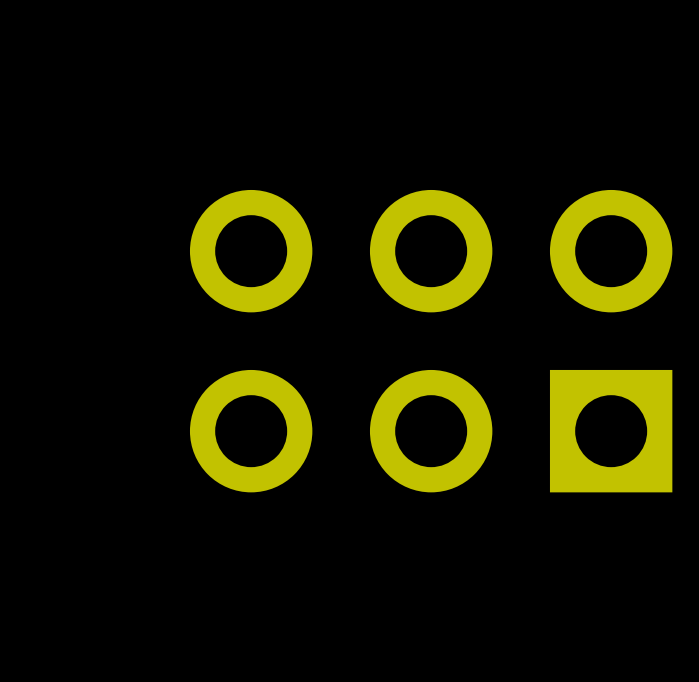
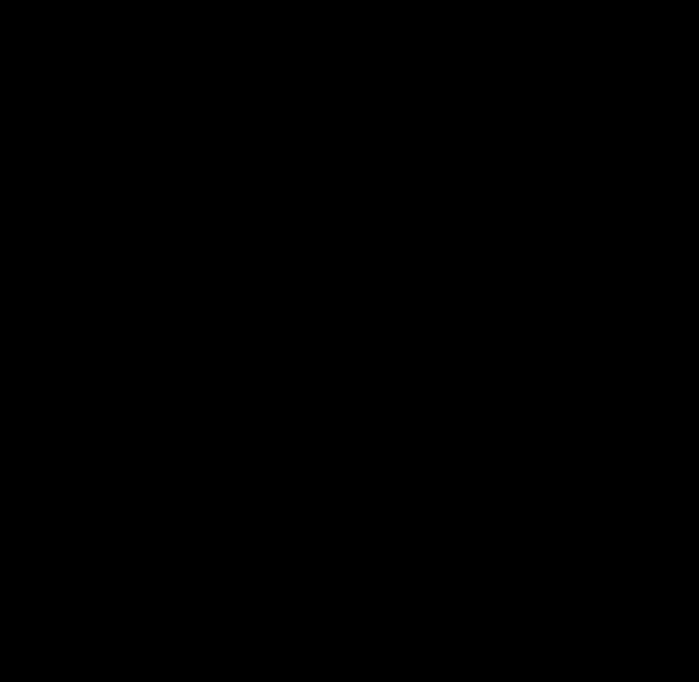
part: (431, 341) -> none

